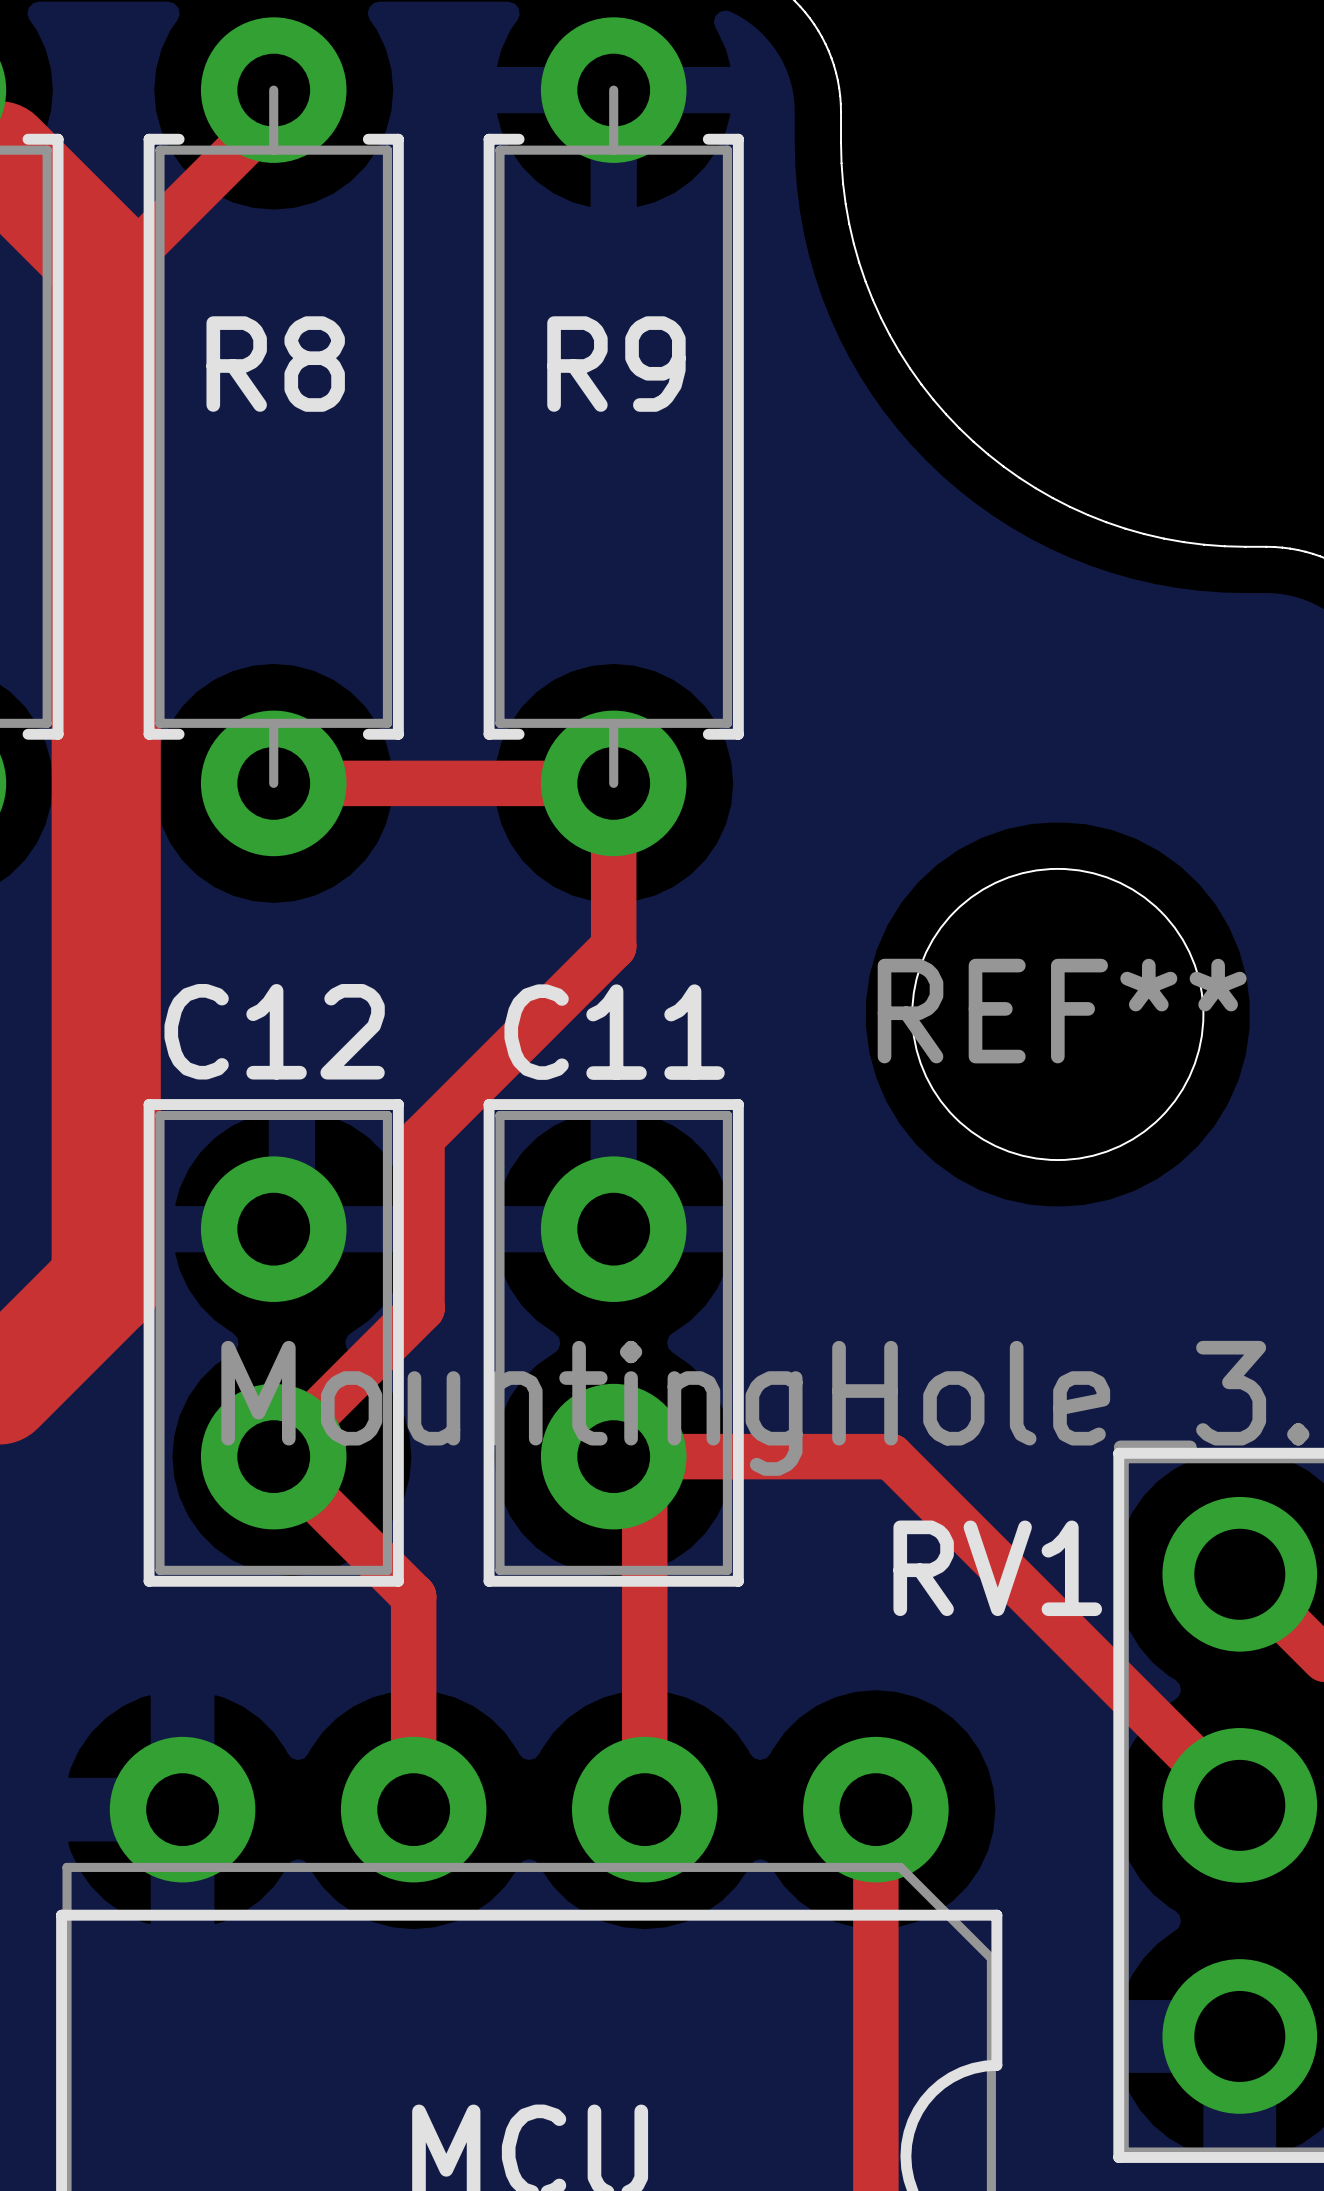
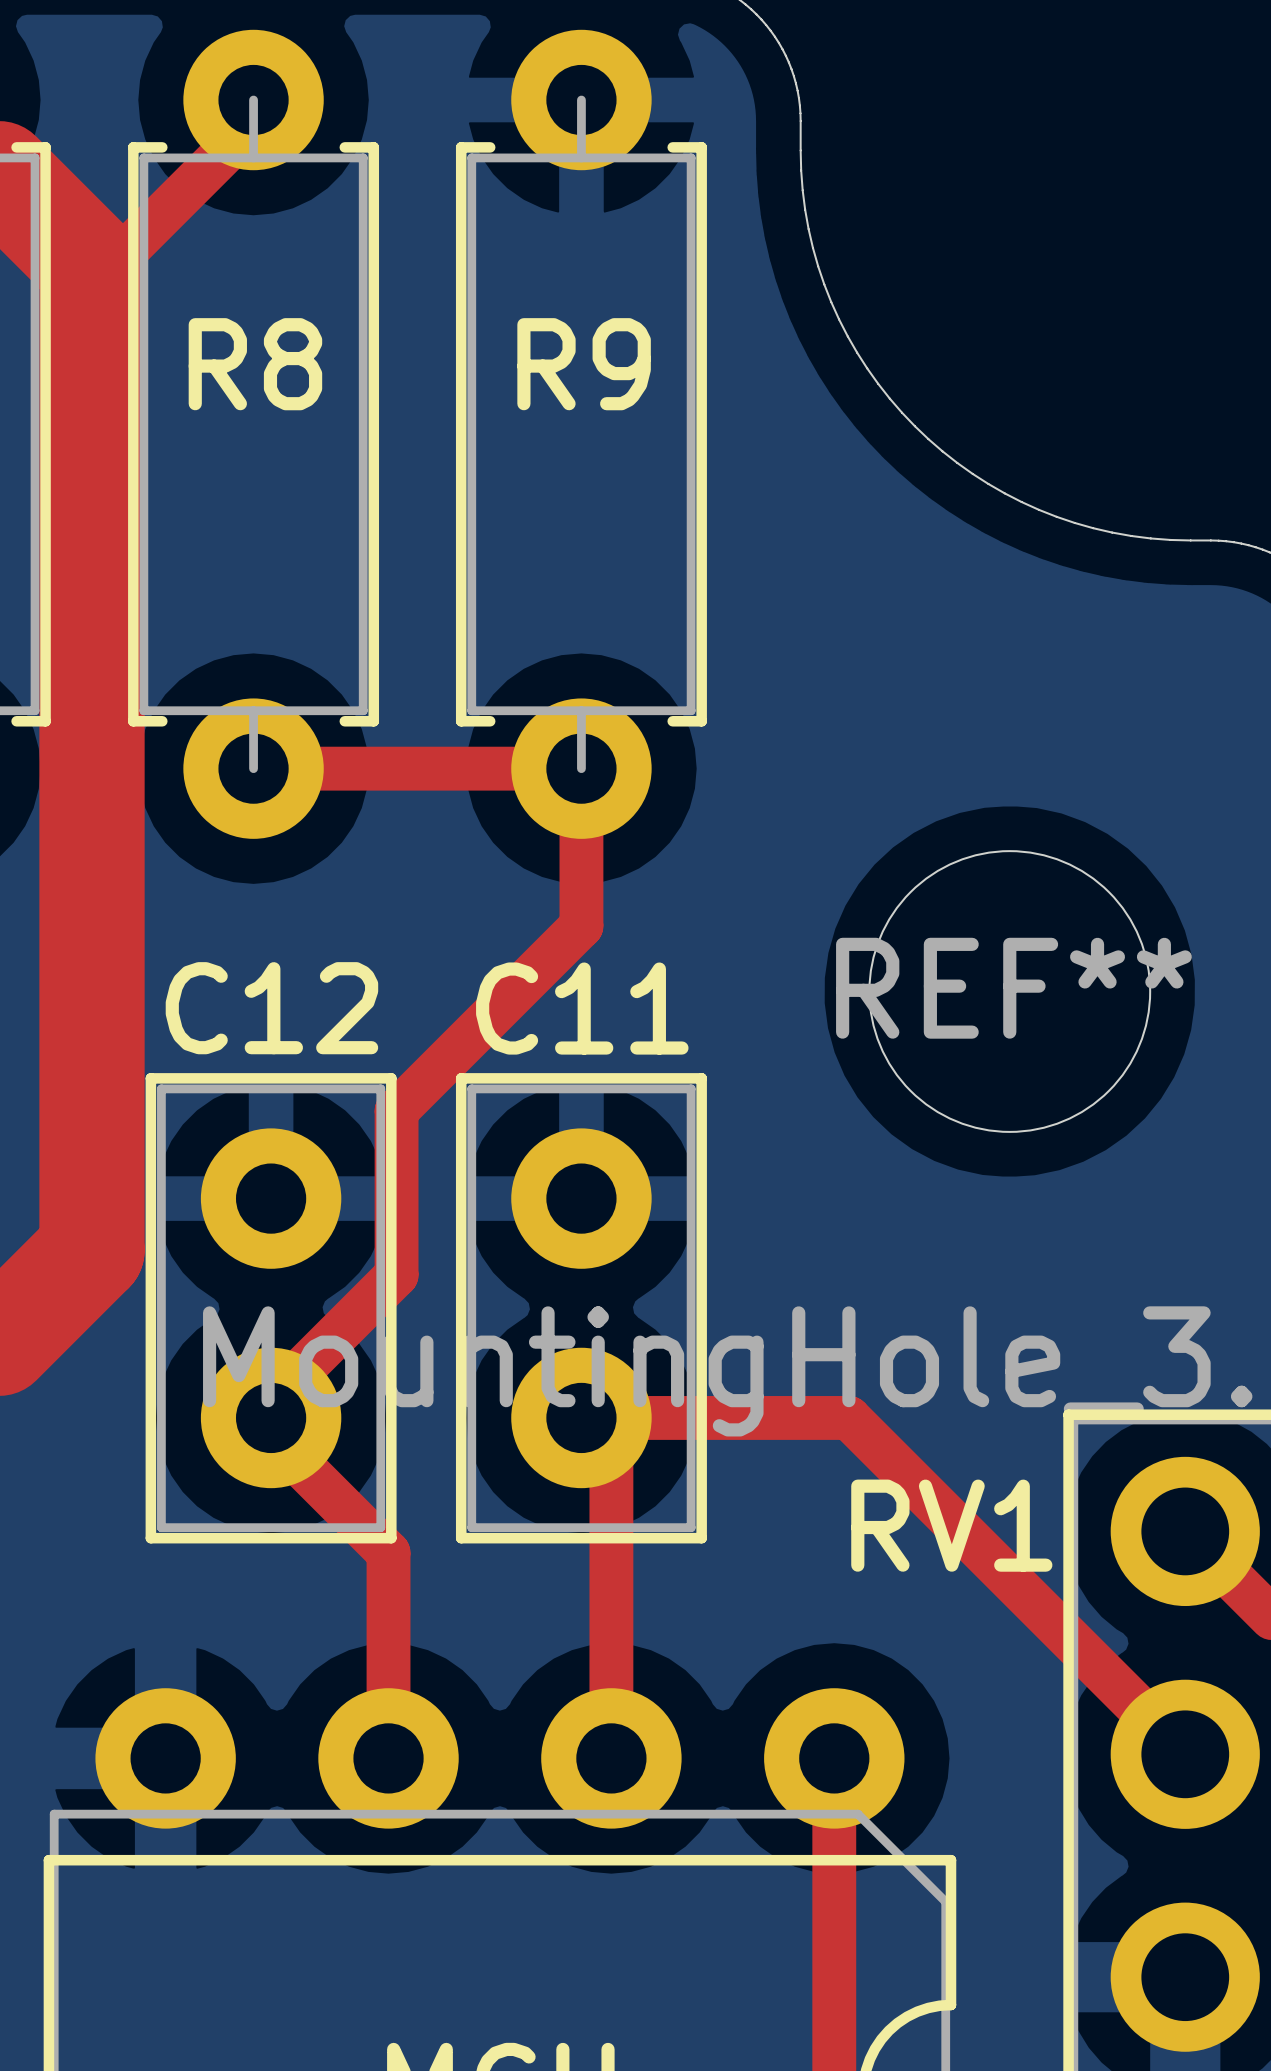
C12 position: (273, 1342) -> (271, 1308)

